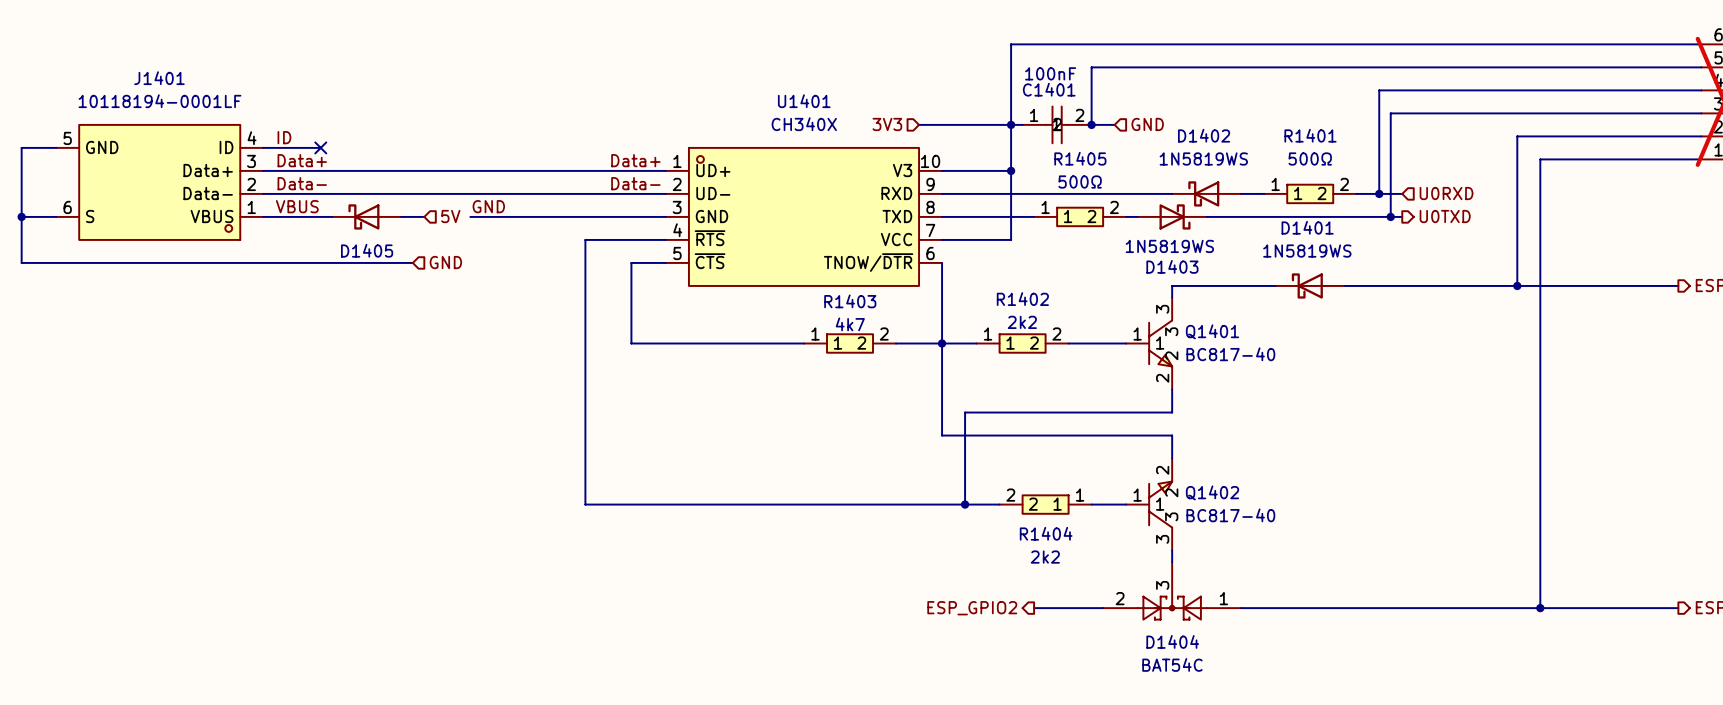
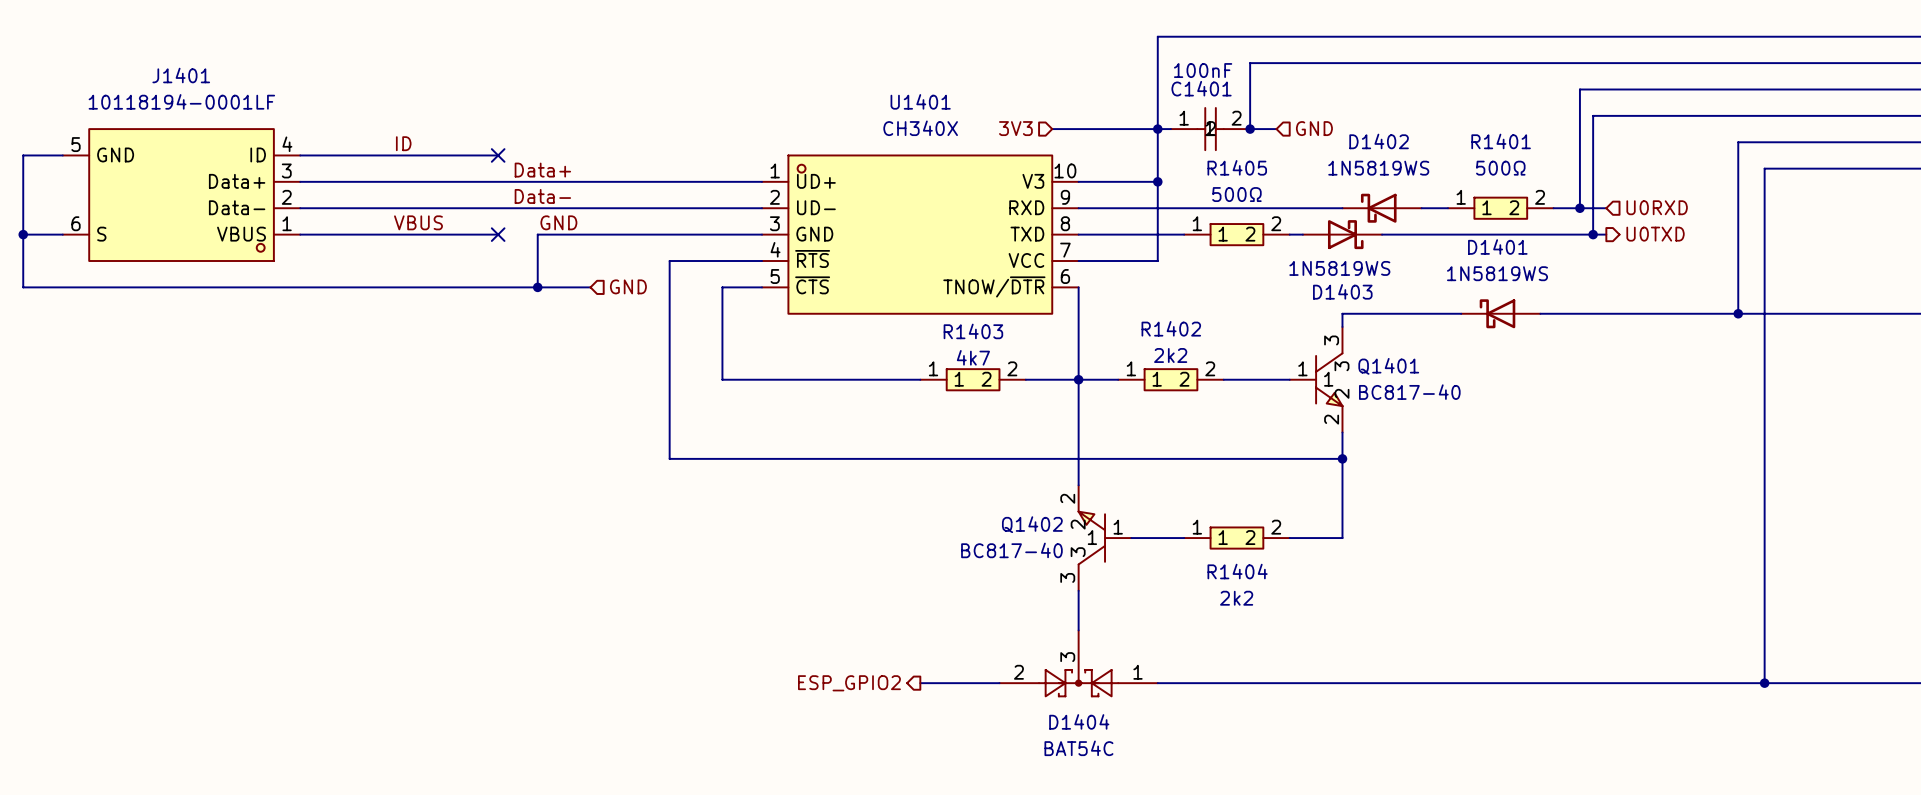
label position: ID (284, 137) -> ID (403, 143)
wire: none -> (366, 155) (498, 155)
no-connect mark: (320, 147) -> none
no-connect mark: none -> (498, 155)
label: Data+ (302, 160) -> none
label: none -> Data+ (542, 170)
label: Data+ (635, 160) -> none
label: Data- (302, 183) -> none
label: none -> Data- (542, 196)
label: Data- (635, 183) -> none
label position: VBUS (297, 206) -> VBUS (418, 222)
D1405: (366, 216) -> none
wire: none -> (484, 234) (498, 234)
no-connect mark: none -> (498, 234)
hierarchical label: 5V (450, 216) -> none
wire: none -> (537, 234) (537, 287)
wire: none -> (471, 287) (590, 287)
hierarchical label position: GND (445, 262) -> GND (628, 286)
junction: none -> (537, 287)
wire: (585, 412) (585, 504) (999, 504) -> (669, 458) (1105, 458)
wire: (965, 412) (965, 504) -> none
junction: none -> (1342, 458)
wire: (942, 435) (1172, 435) -> (1342, 458) (1342, 485)
wire: none -> (1342, 511) (1342, 538) (1289, 538)
wire: none -> (1131, 538) (1184, 538)
junction: (965, 504) -> none
R1404 rotation: 0° (1045, 504) -> 180° (1236, 538)
wire: (1091, 504) (1126, 504) -> none
Q1402 position: (1149, 504) -> (1105, 538)
Q1402 flip: as is (1160, 504) -> left-right (1091, 538)
wire: none -> (1078, 590) (1078, 630)
wire: (1172, 550) (1172, 562) -> none
D1404 position: (1172, 590) -> (1078, 663)
hierarchical label: none -> ESP_GPIO2 (849, 683)
wire: none -> (920, 683) (999, 683)
hierarchical label: ESP_GPIO2 (972, 608) -> none
wire: none -> (1157, 683) (1184, 683)

